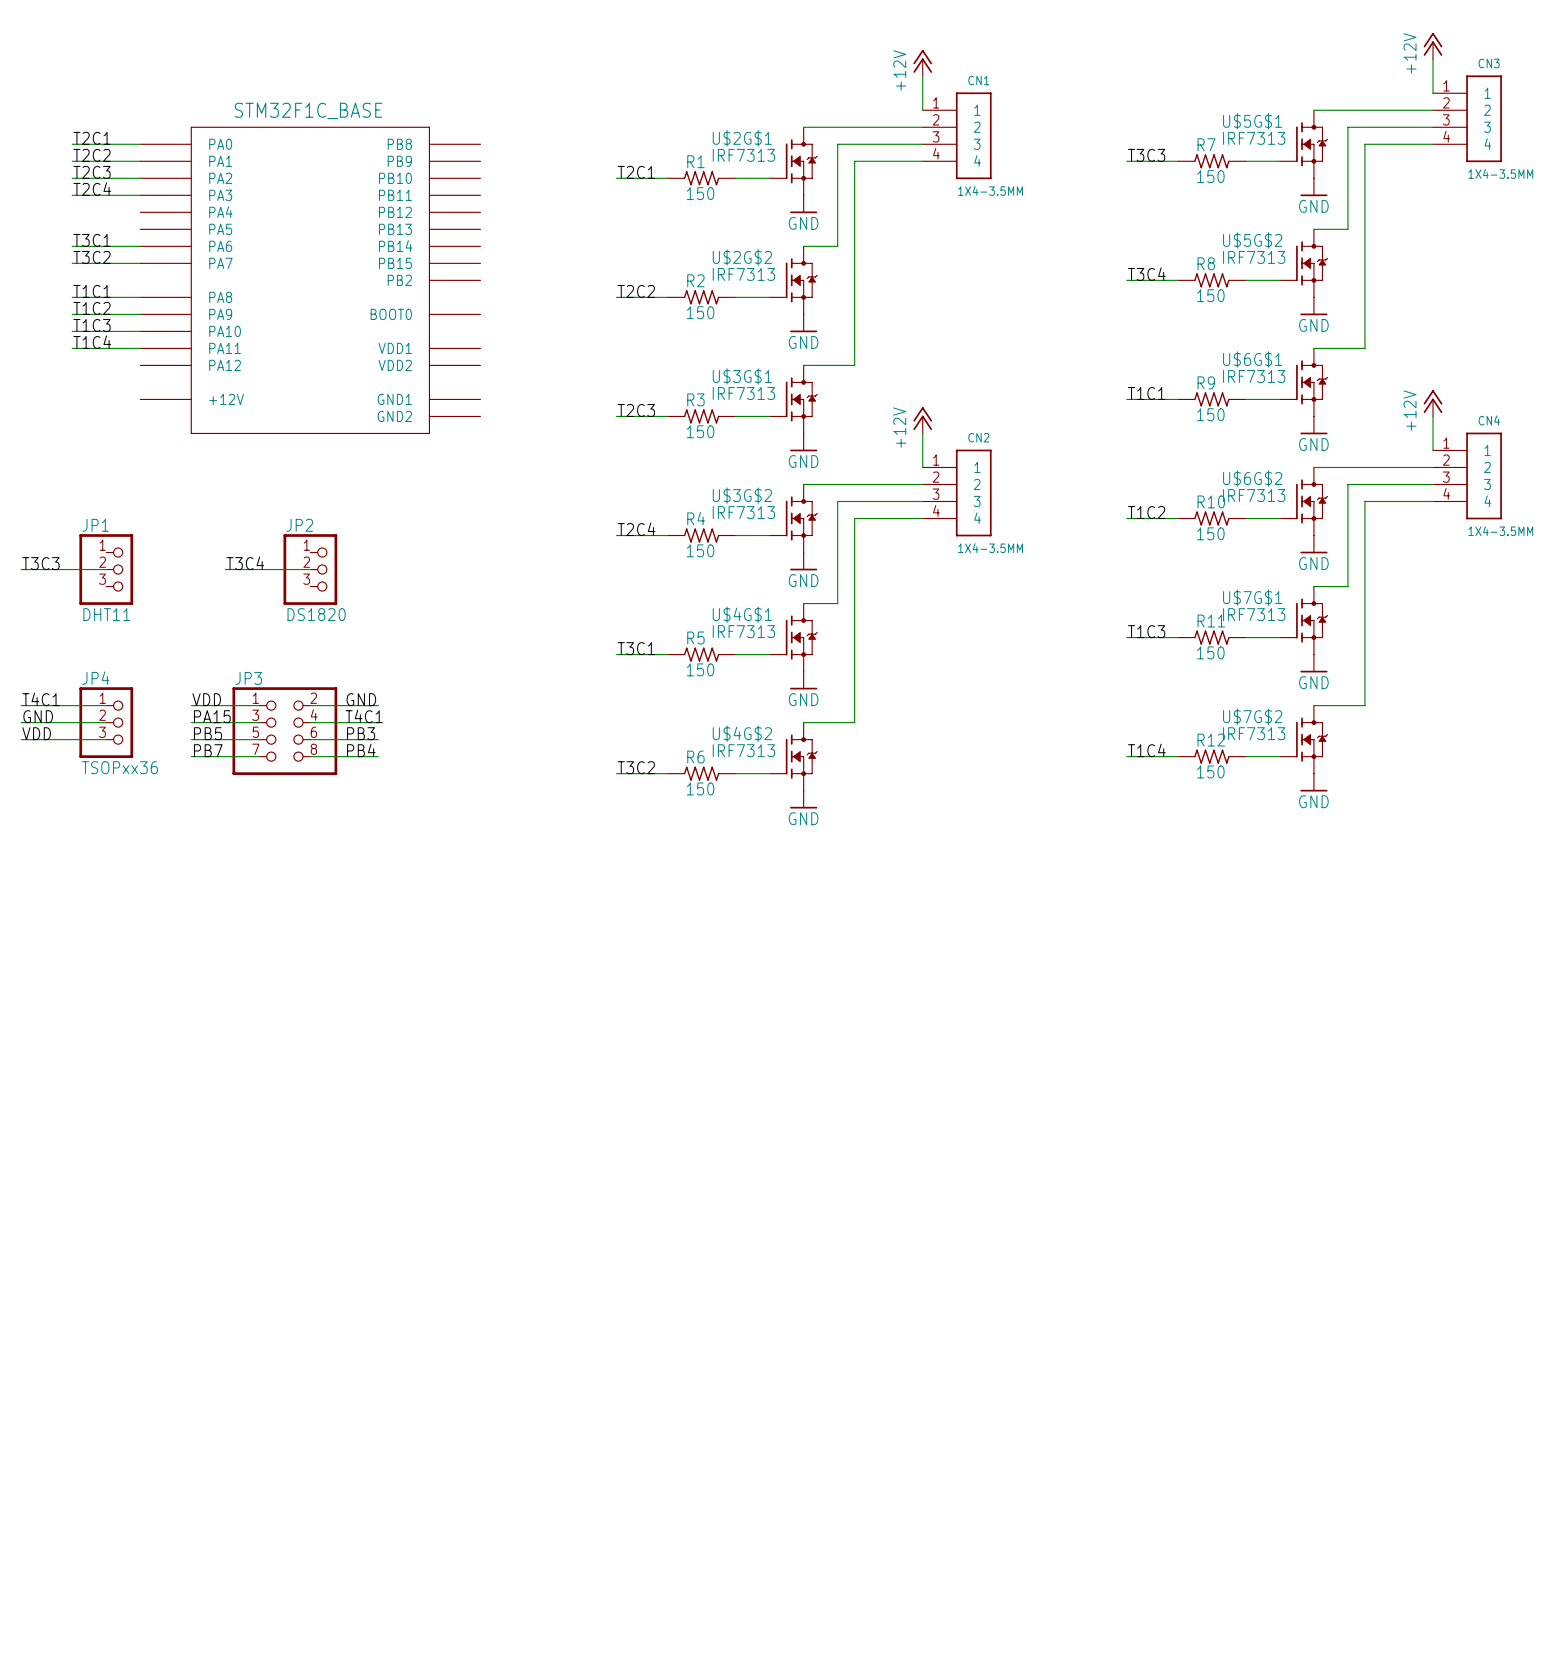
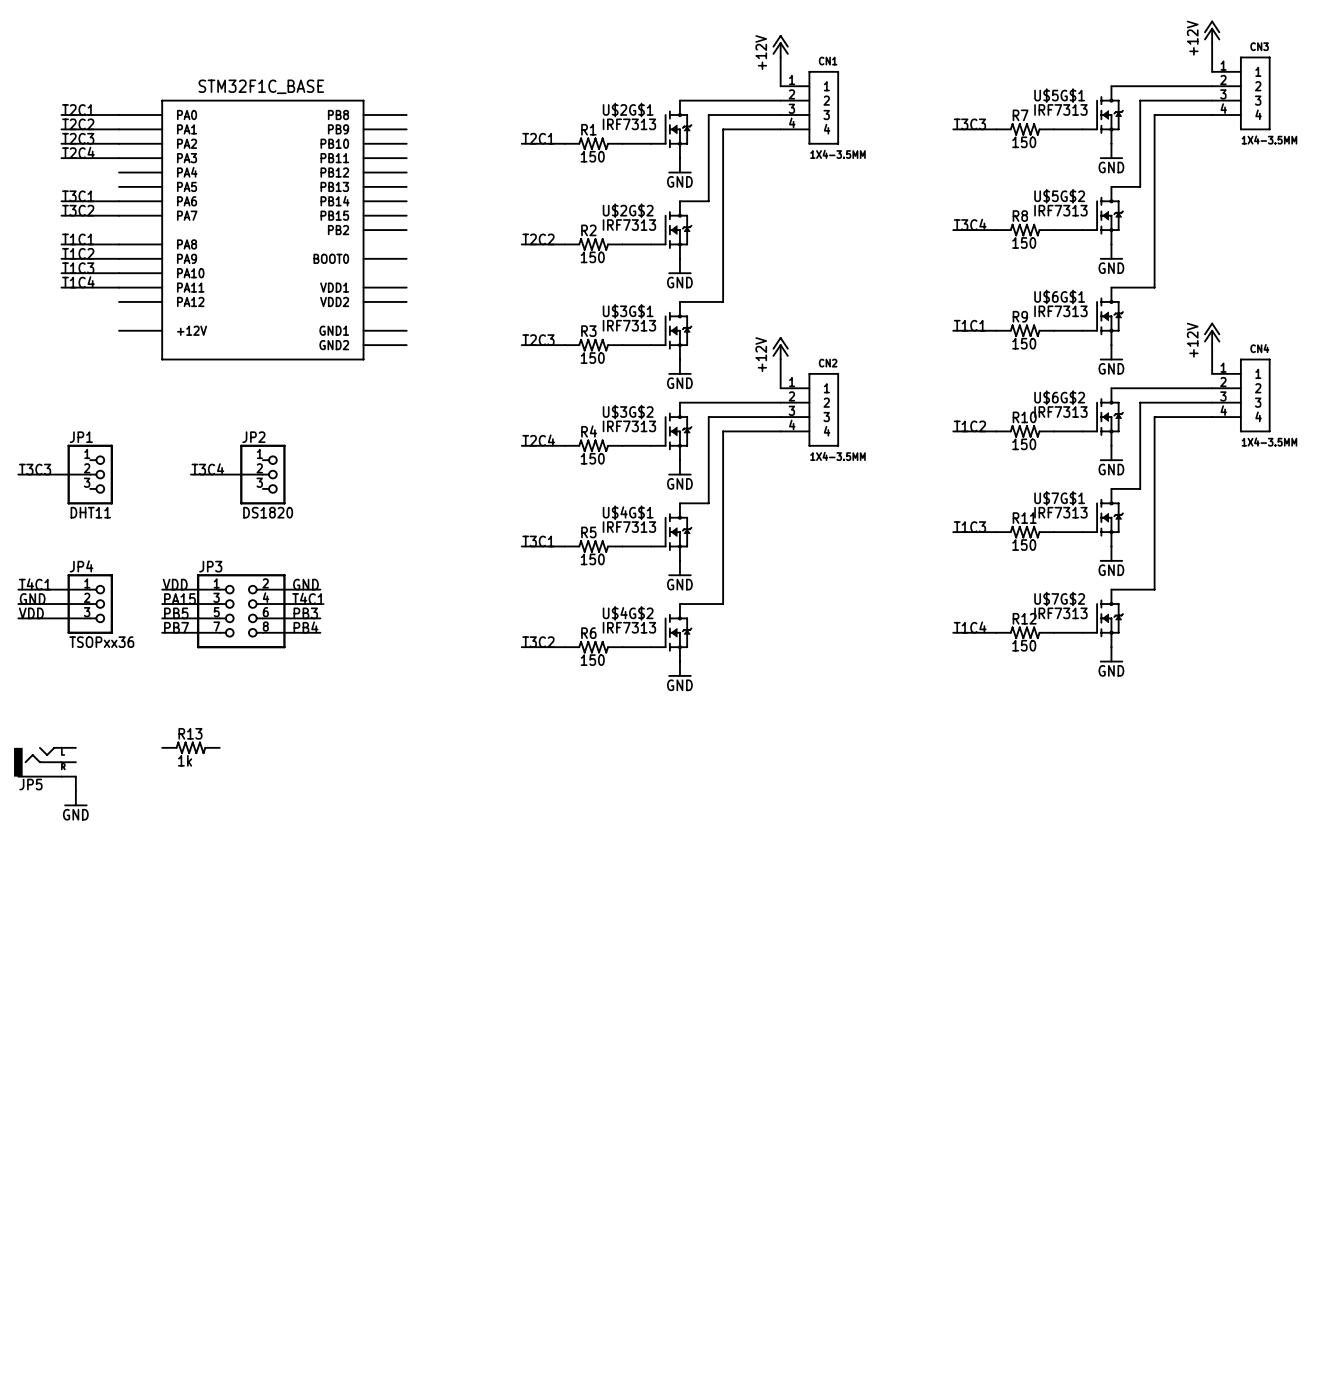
R13: none -> 1k (190, 747)
JP5: none -> (44, 762)
wire: none -> (75, 776) (75, 791)
power symbol: none -> GND (75, 798)

